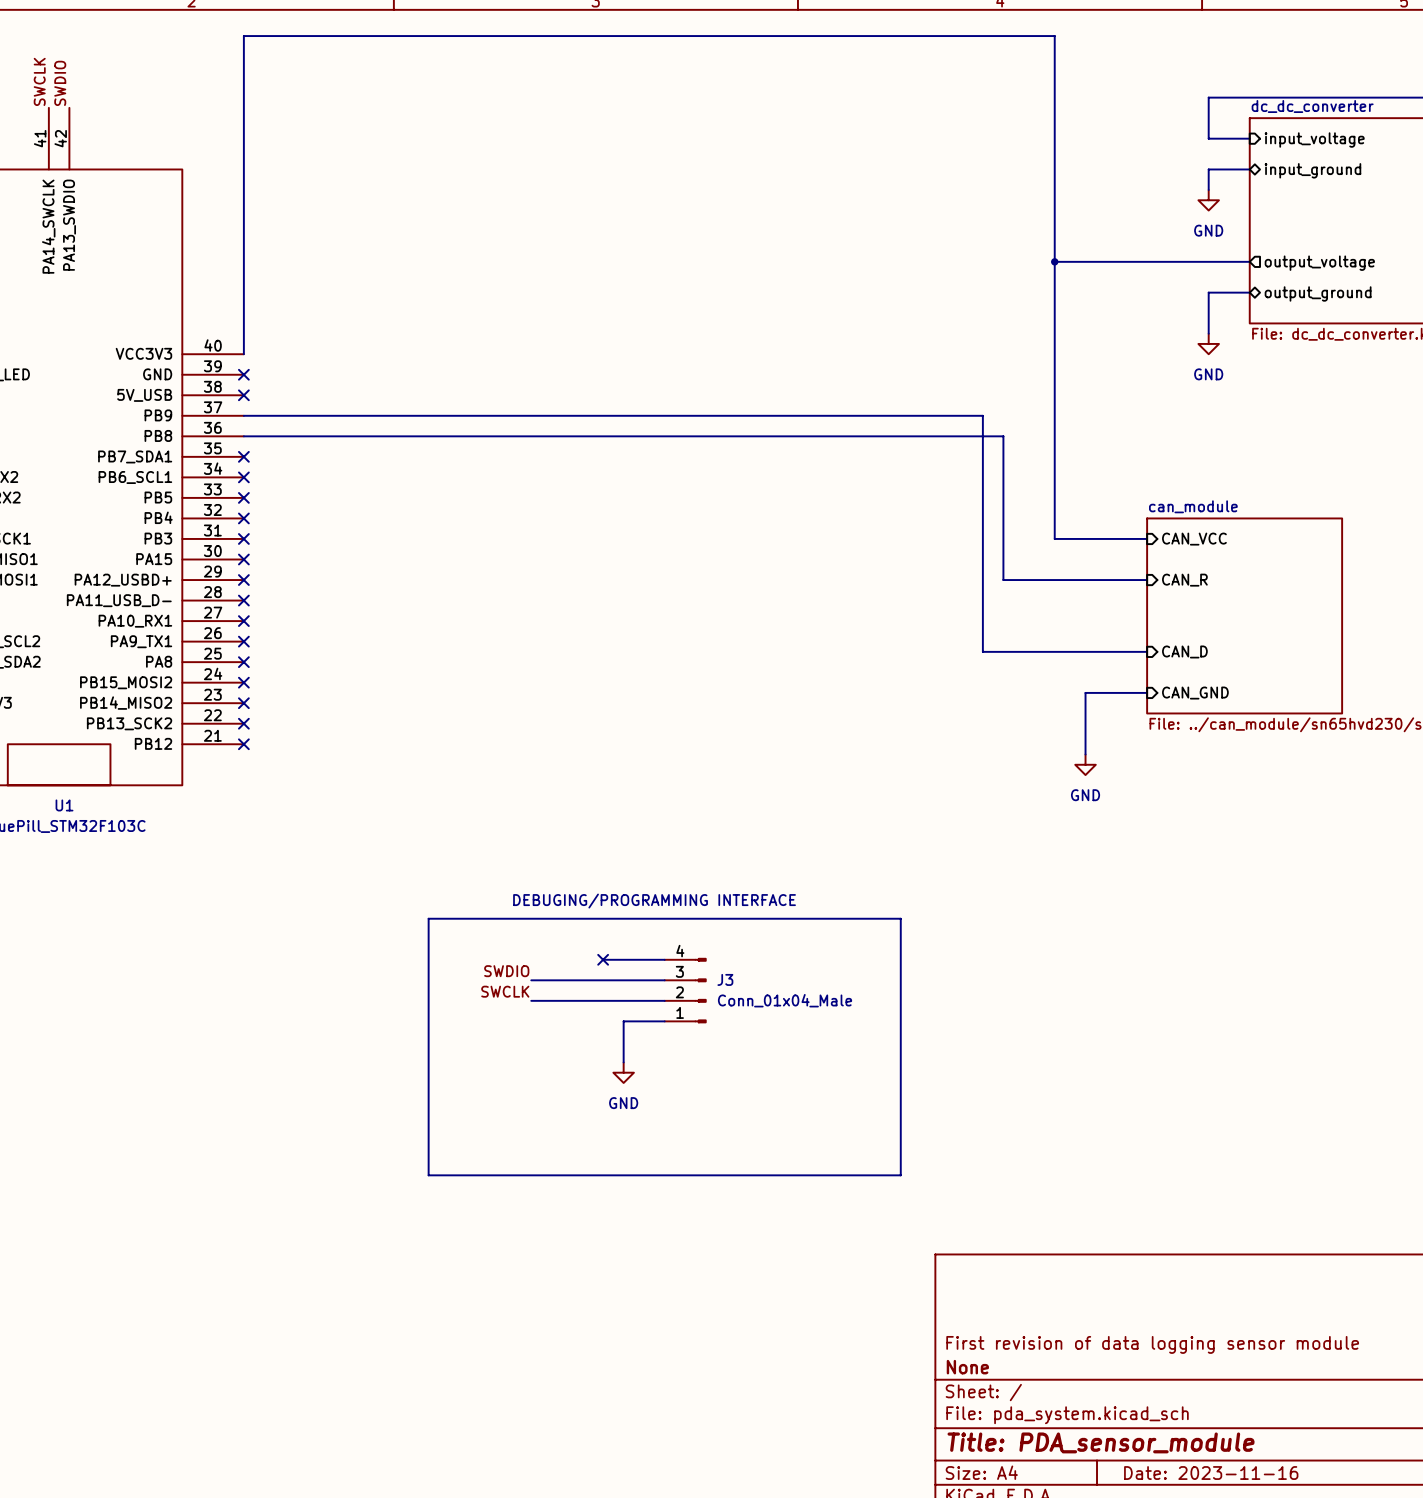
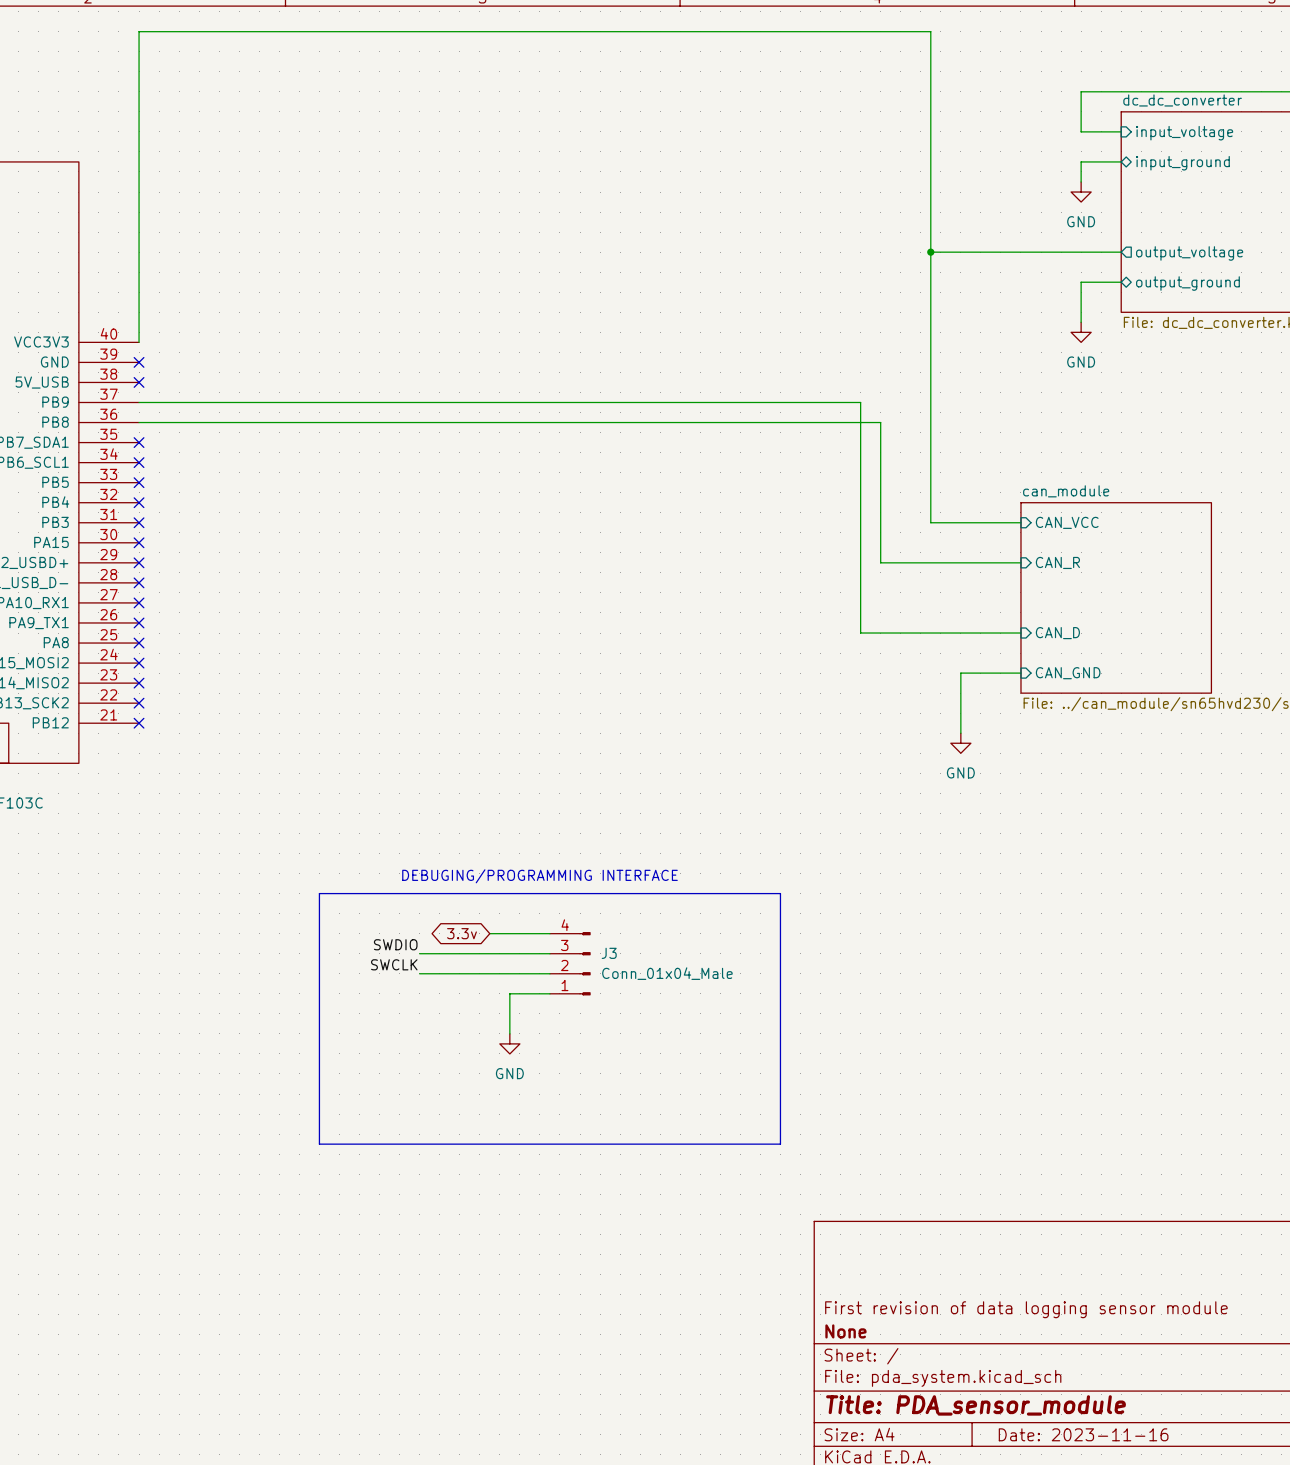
global label: none -> 3.3v (461, 933)
no-connect mark: (603, 959) -> none

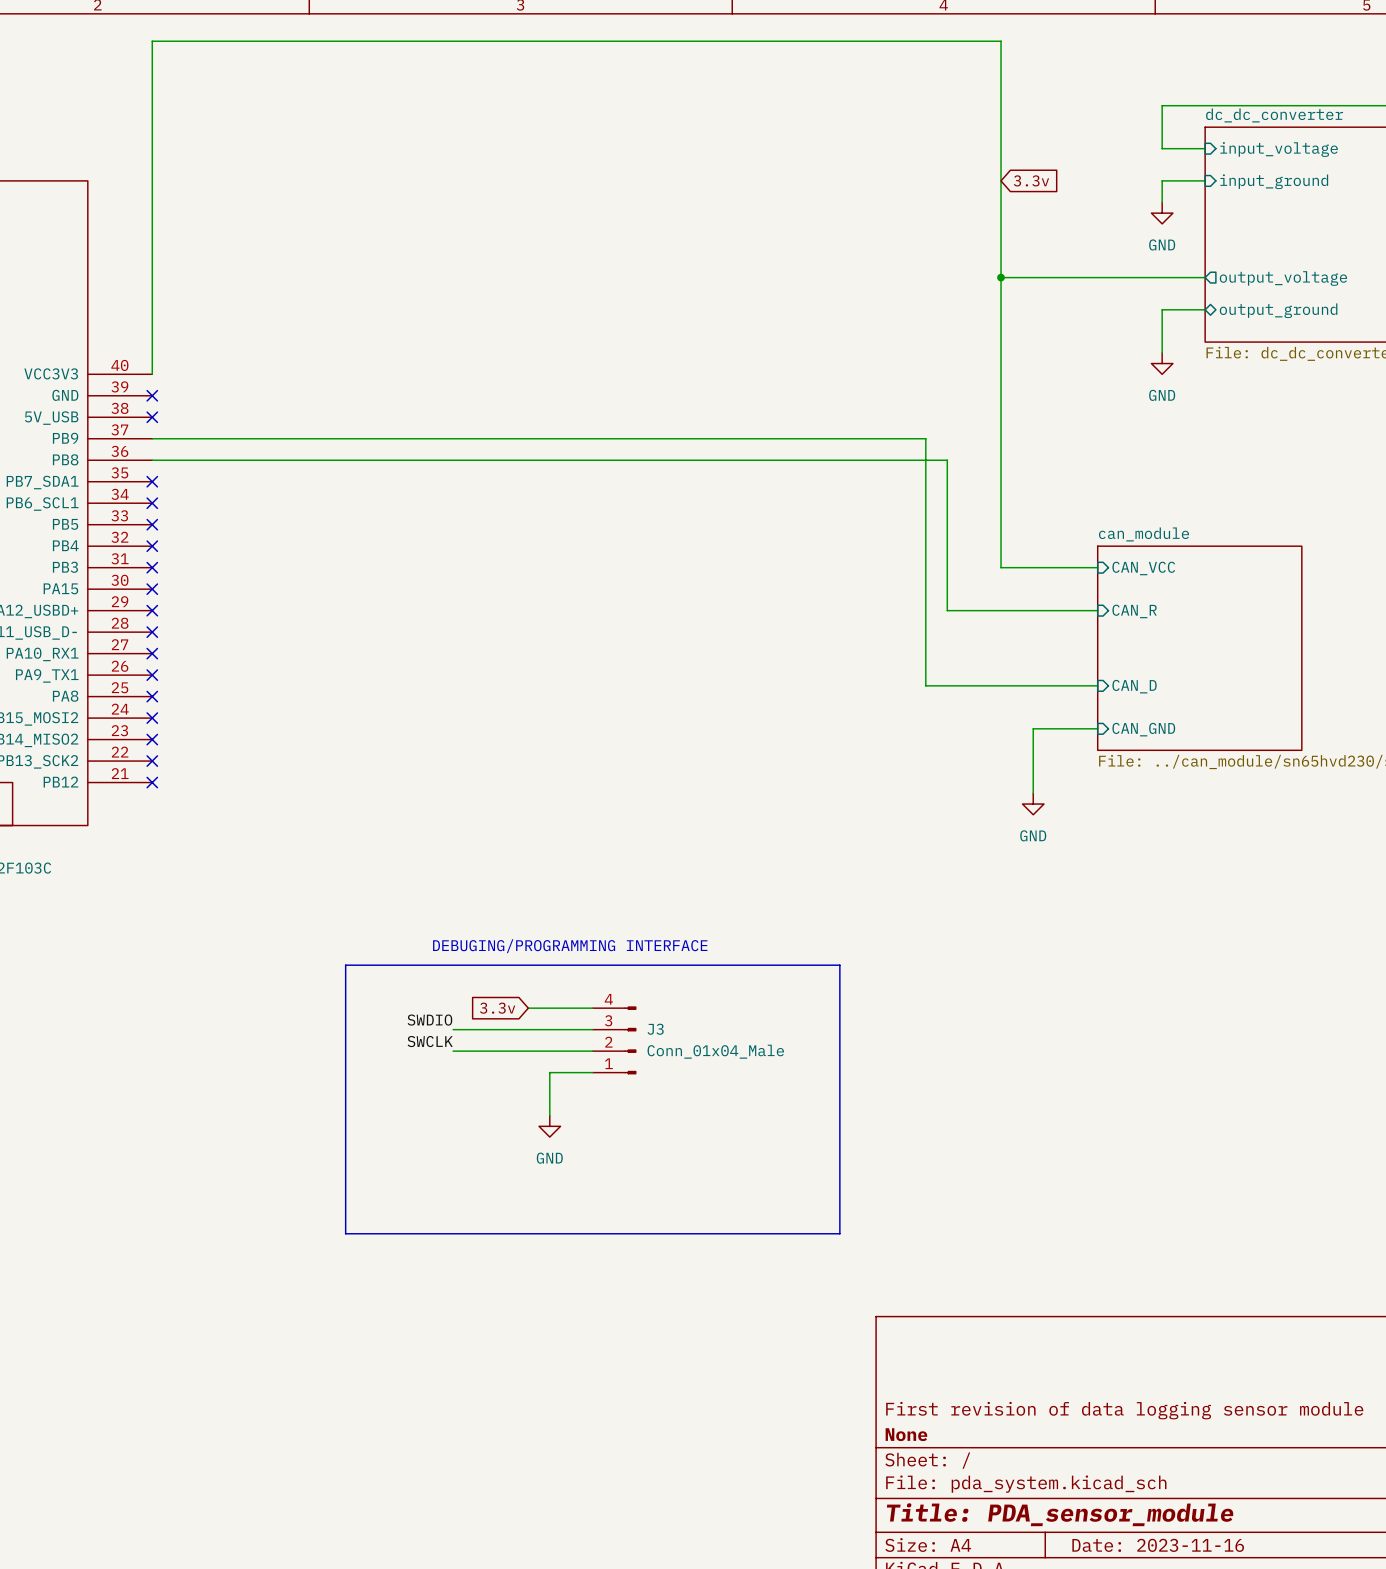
global label: none -> 3.3v (1031, 180)
sheet pin shape: bidirectional (1182, 163) -> input (1274, 181)
global label shape: bidirectional (461, 933) -> input (497, 1008)

